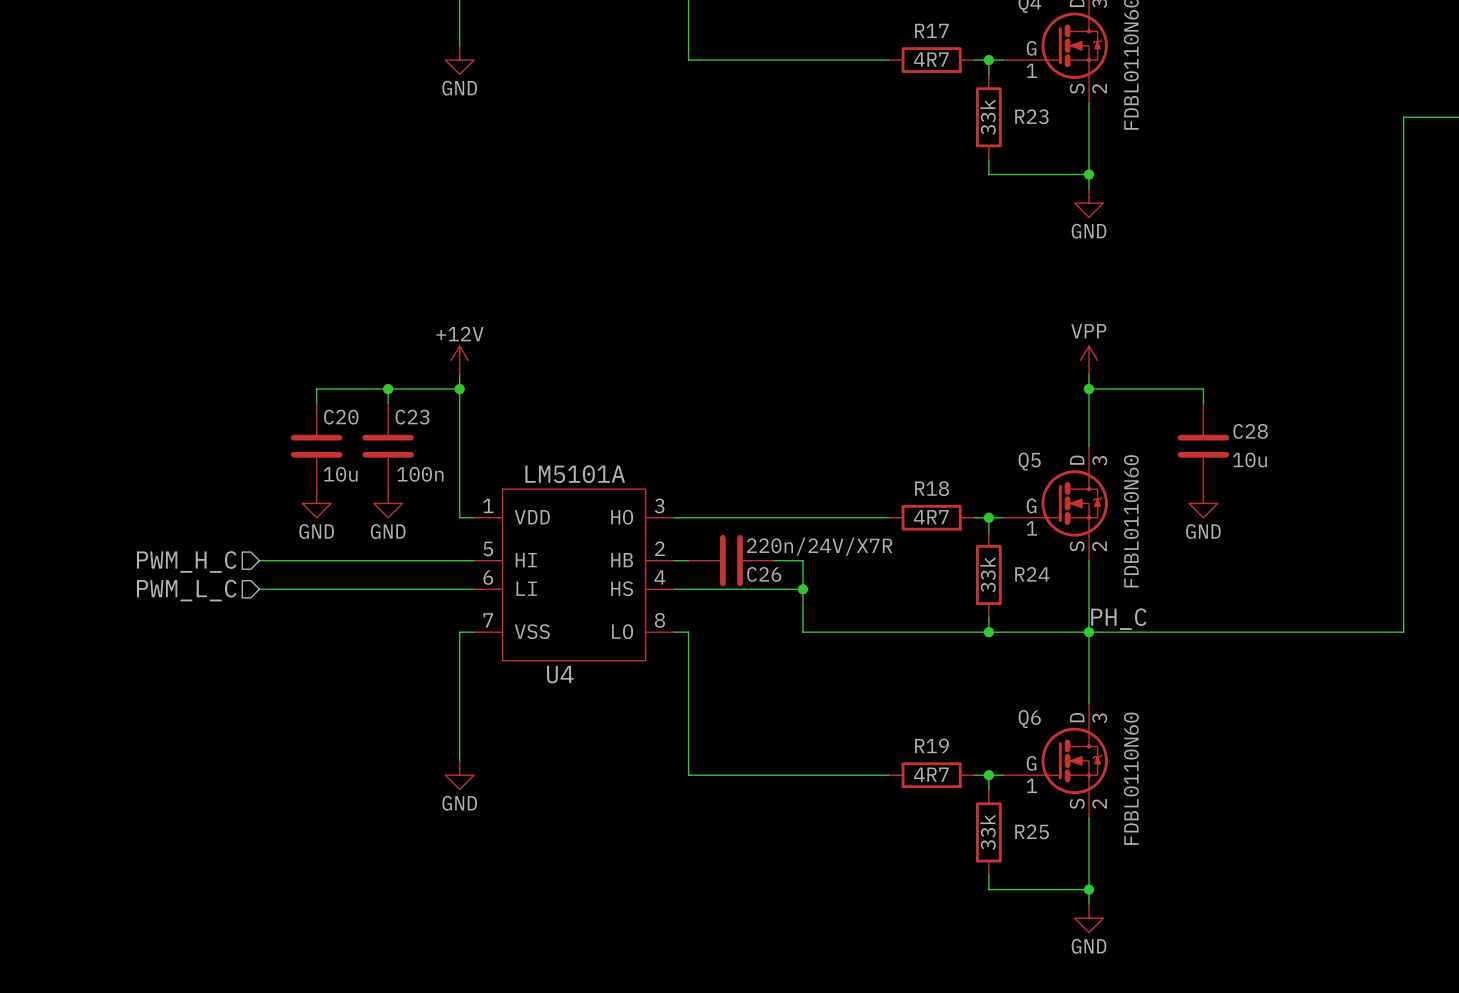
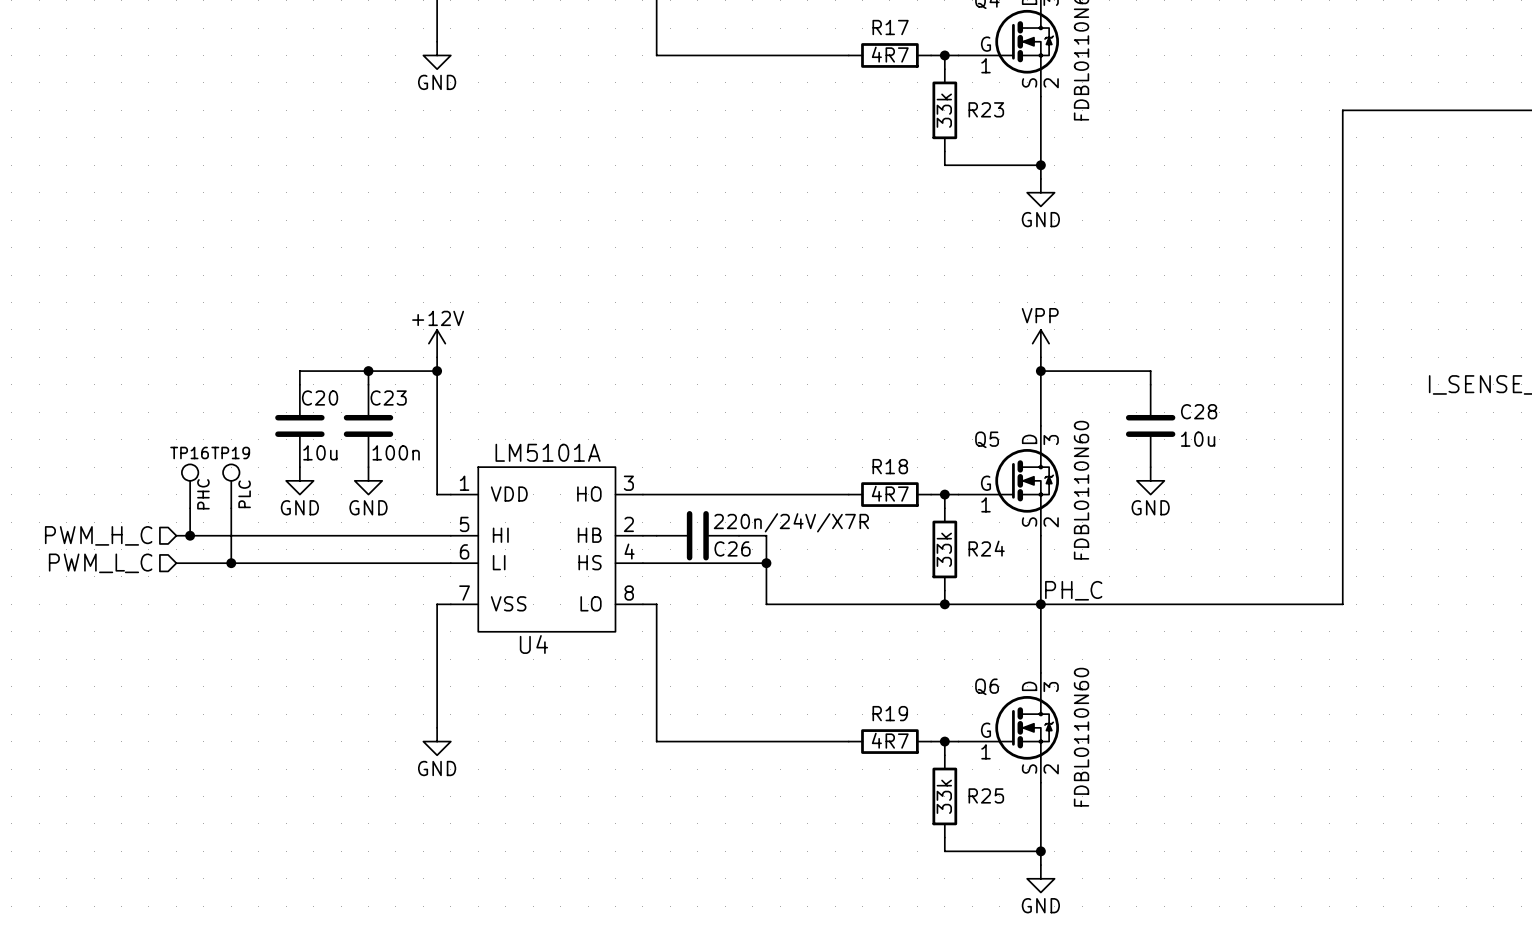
TP16: none -> PHC (190, 486)
TP19: none -> PLC (231, 486)
wire: none -> (190, 508) (190, 535)
wire: none -> (231, 508) (231, 563)
wire: none -> (176, 535) (245, 535)
junction: none -> (190, 535)
hierarchical label position: PWM_H_C (186, 561) -> PWM_H_C (98, 535)
wire: none -> (176, 563) (245, 563)
junction: none -> (231, 563)
hierarchical label position: PWM_L_C (186, 590) -> PWM_L_C (100, 563)

